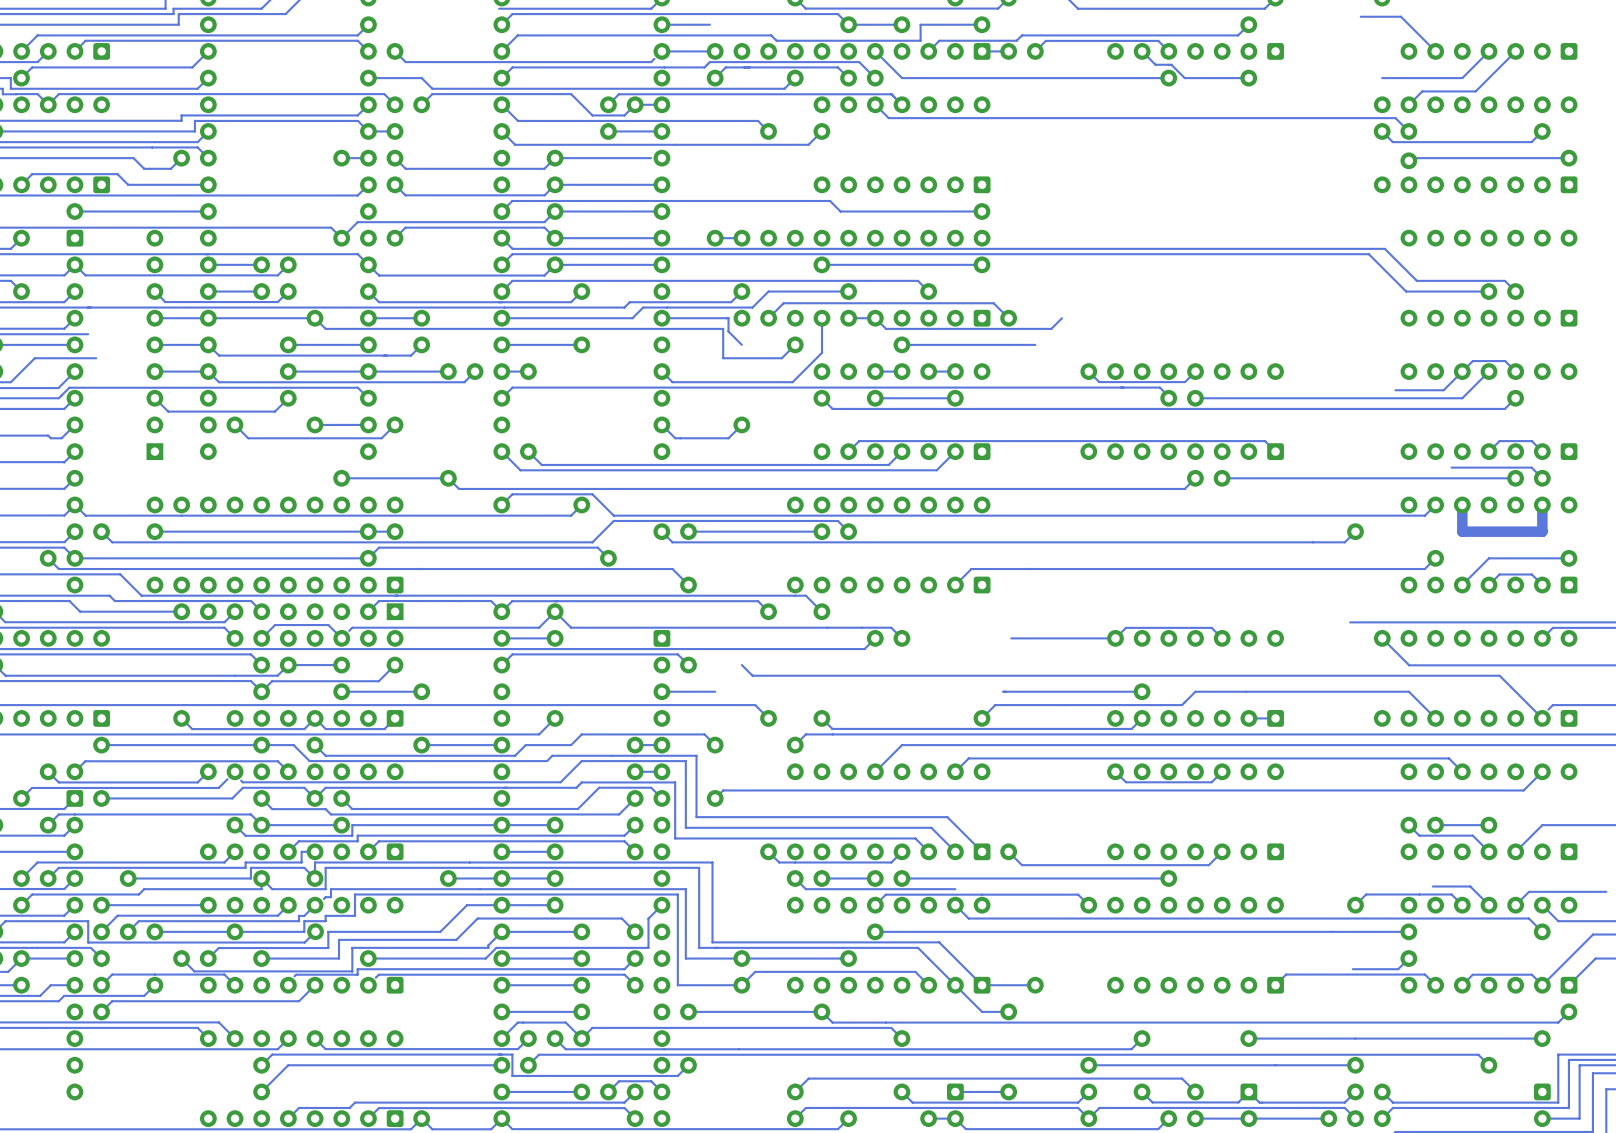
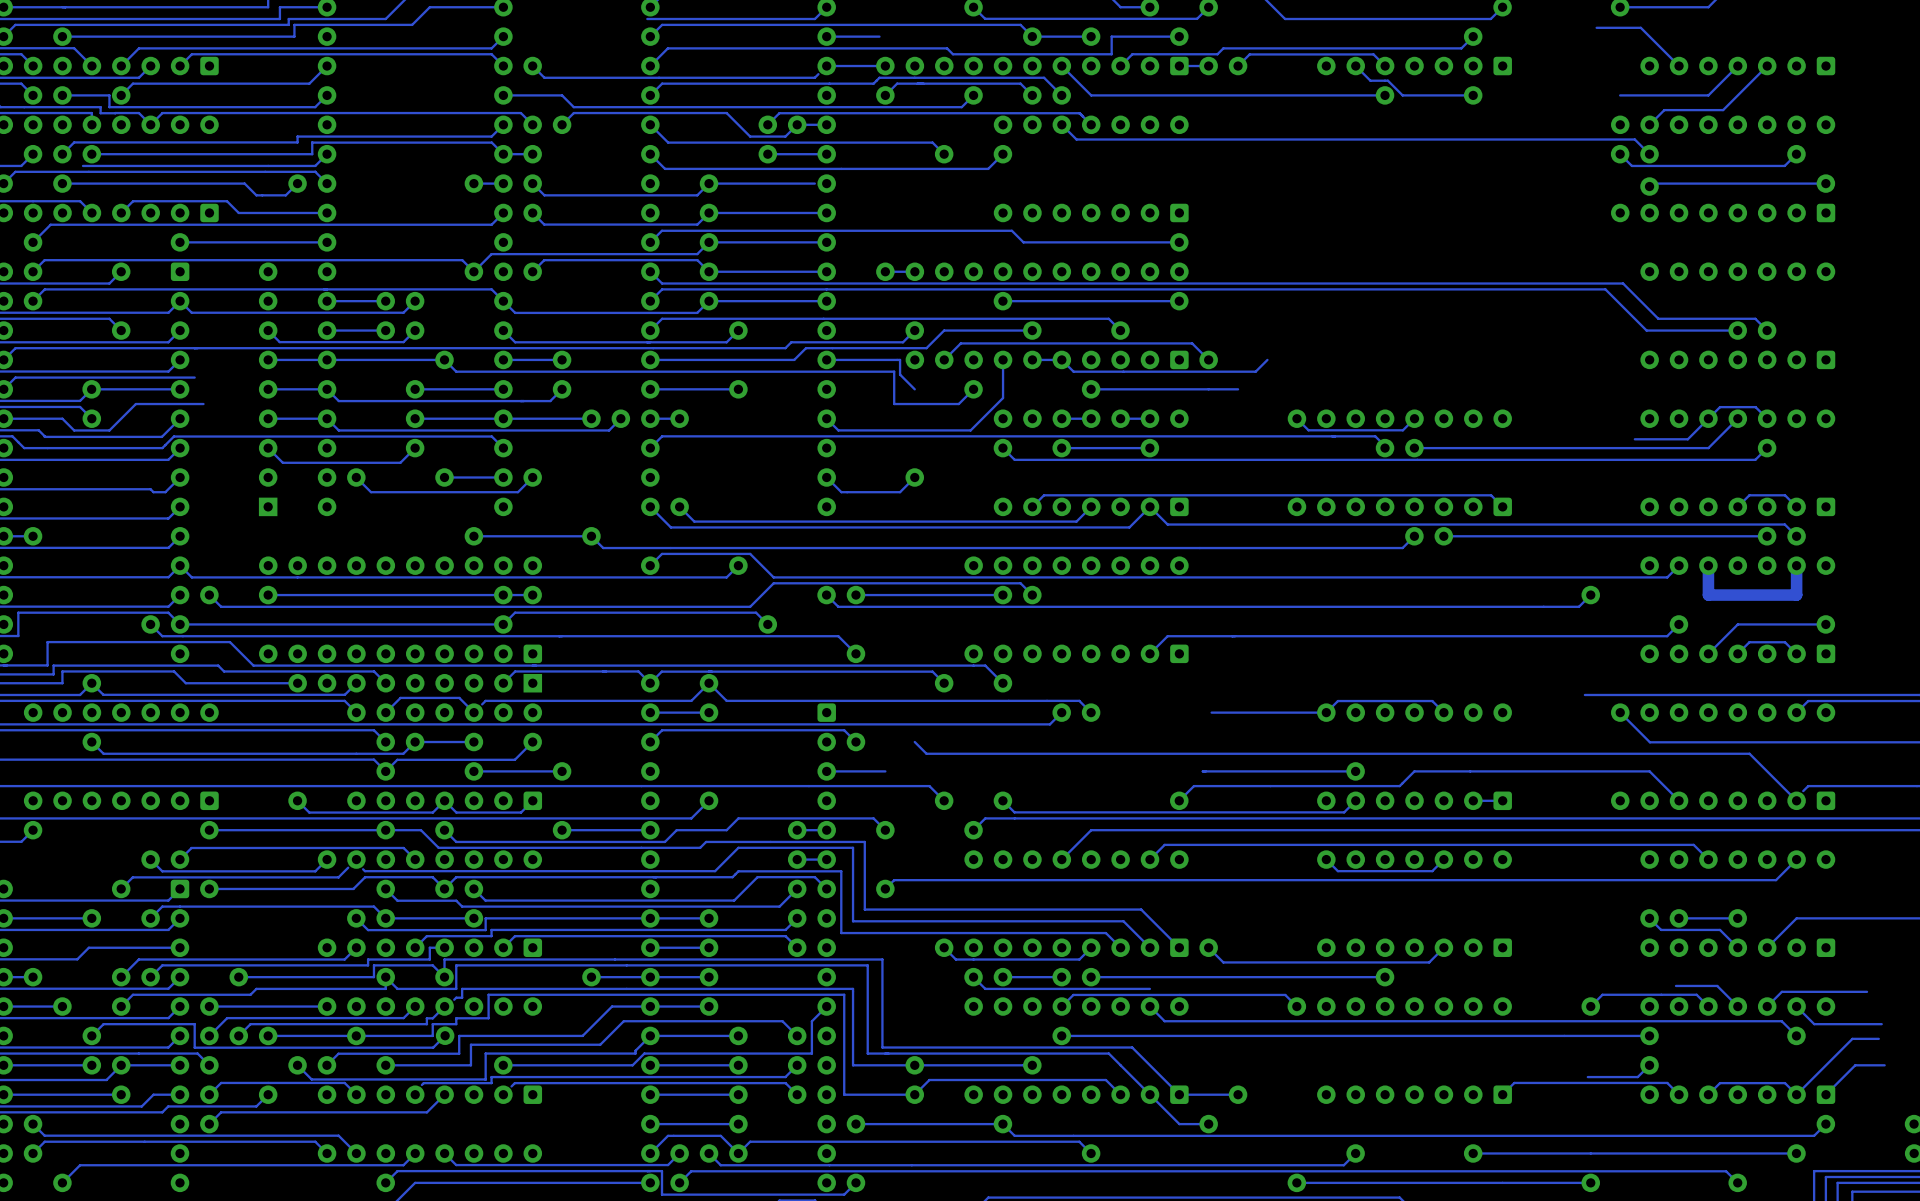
track: none -> (1150, 506) (1167, 524) (1696, 524)

